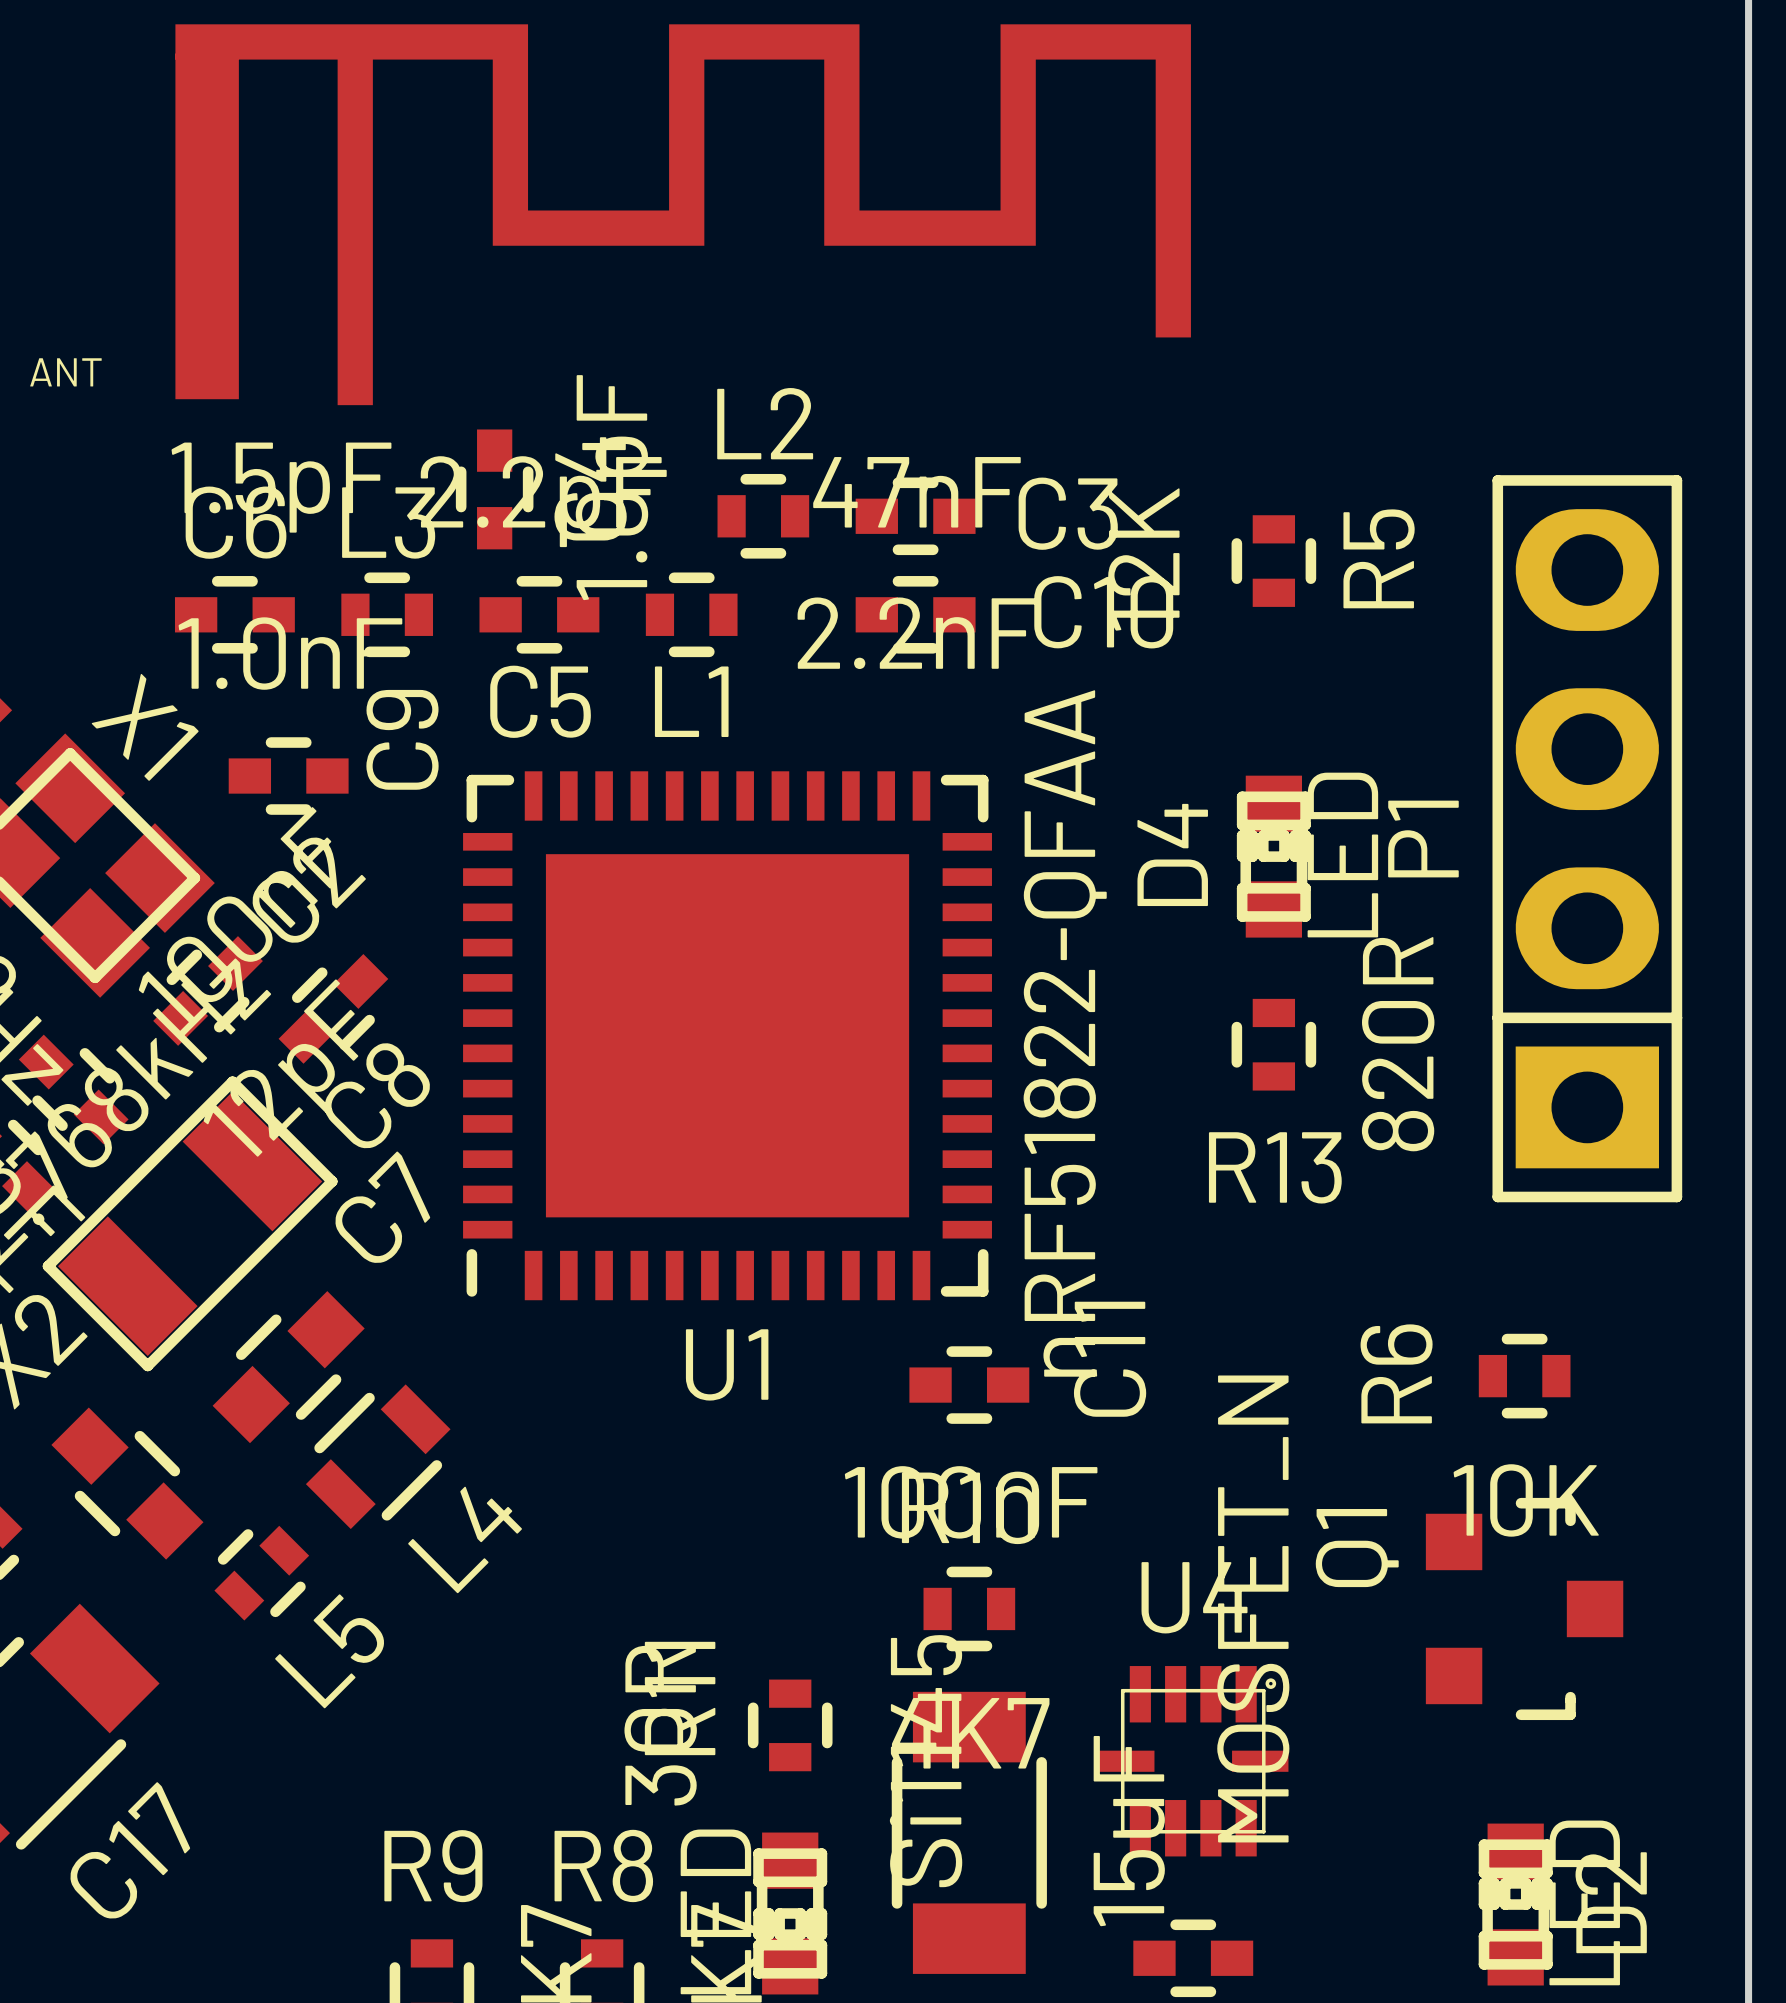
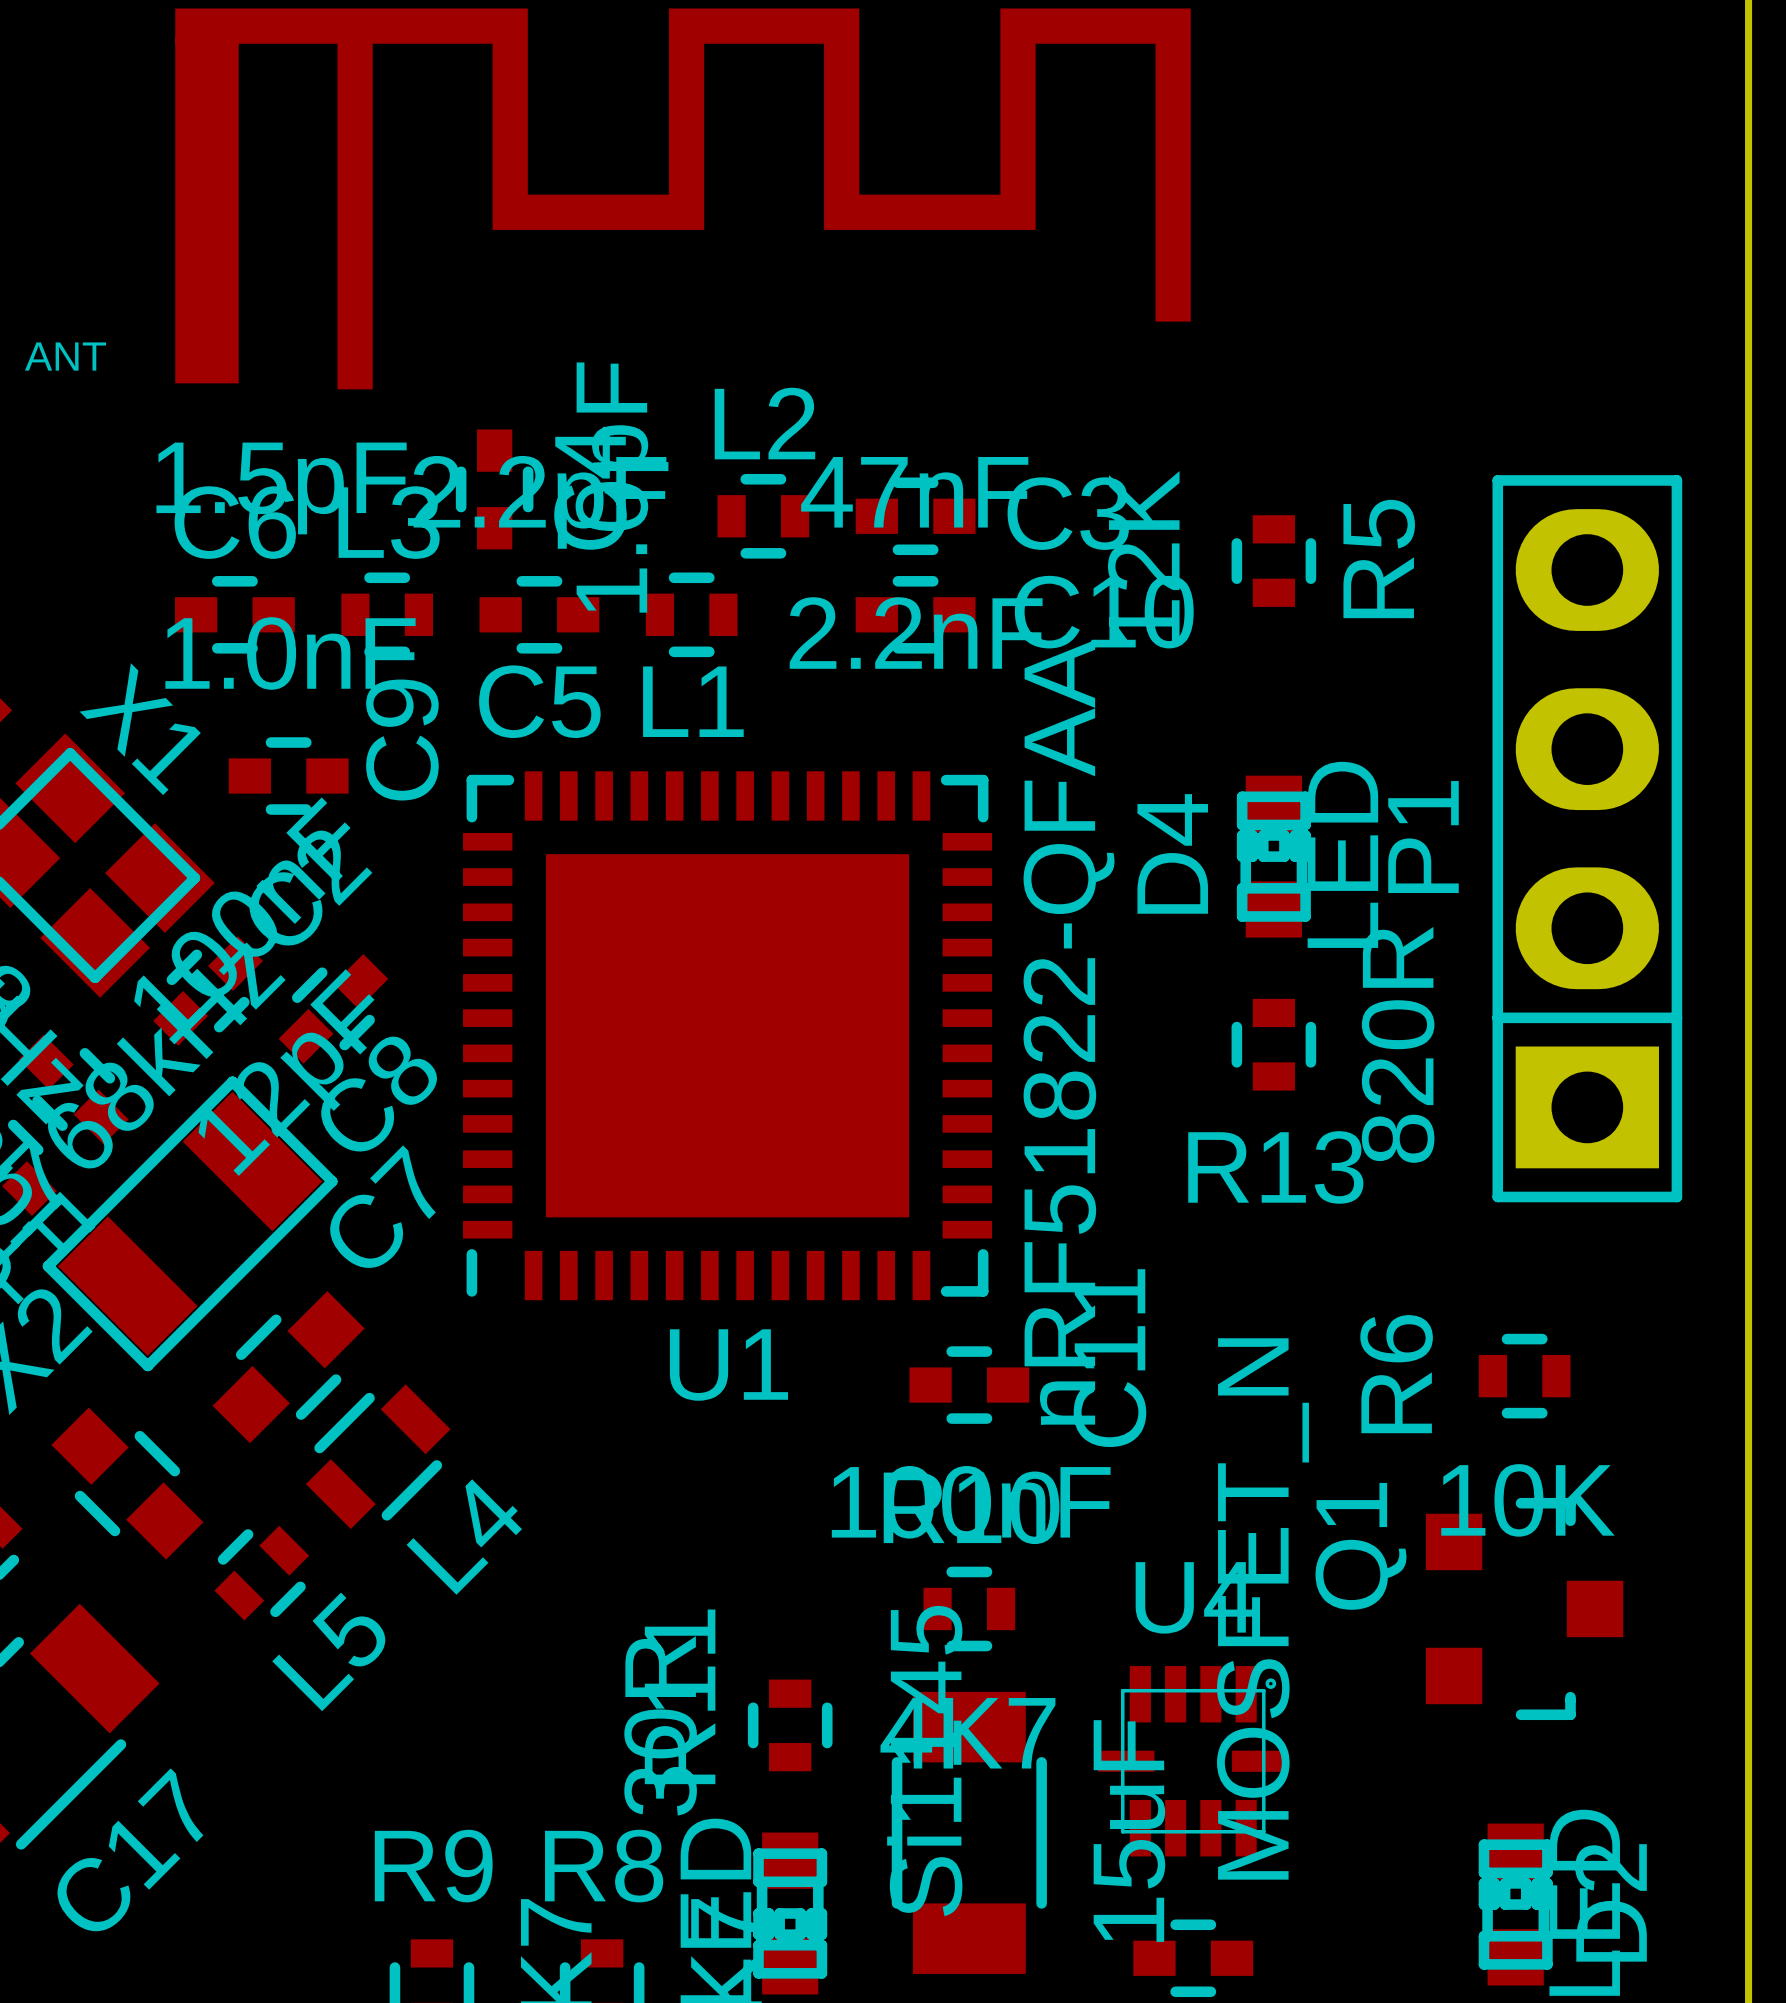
part position: (683, 214) -> (683, 198)

